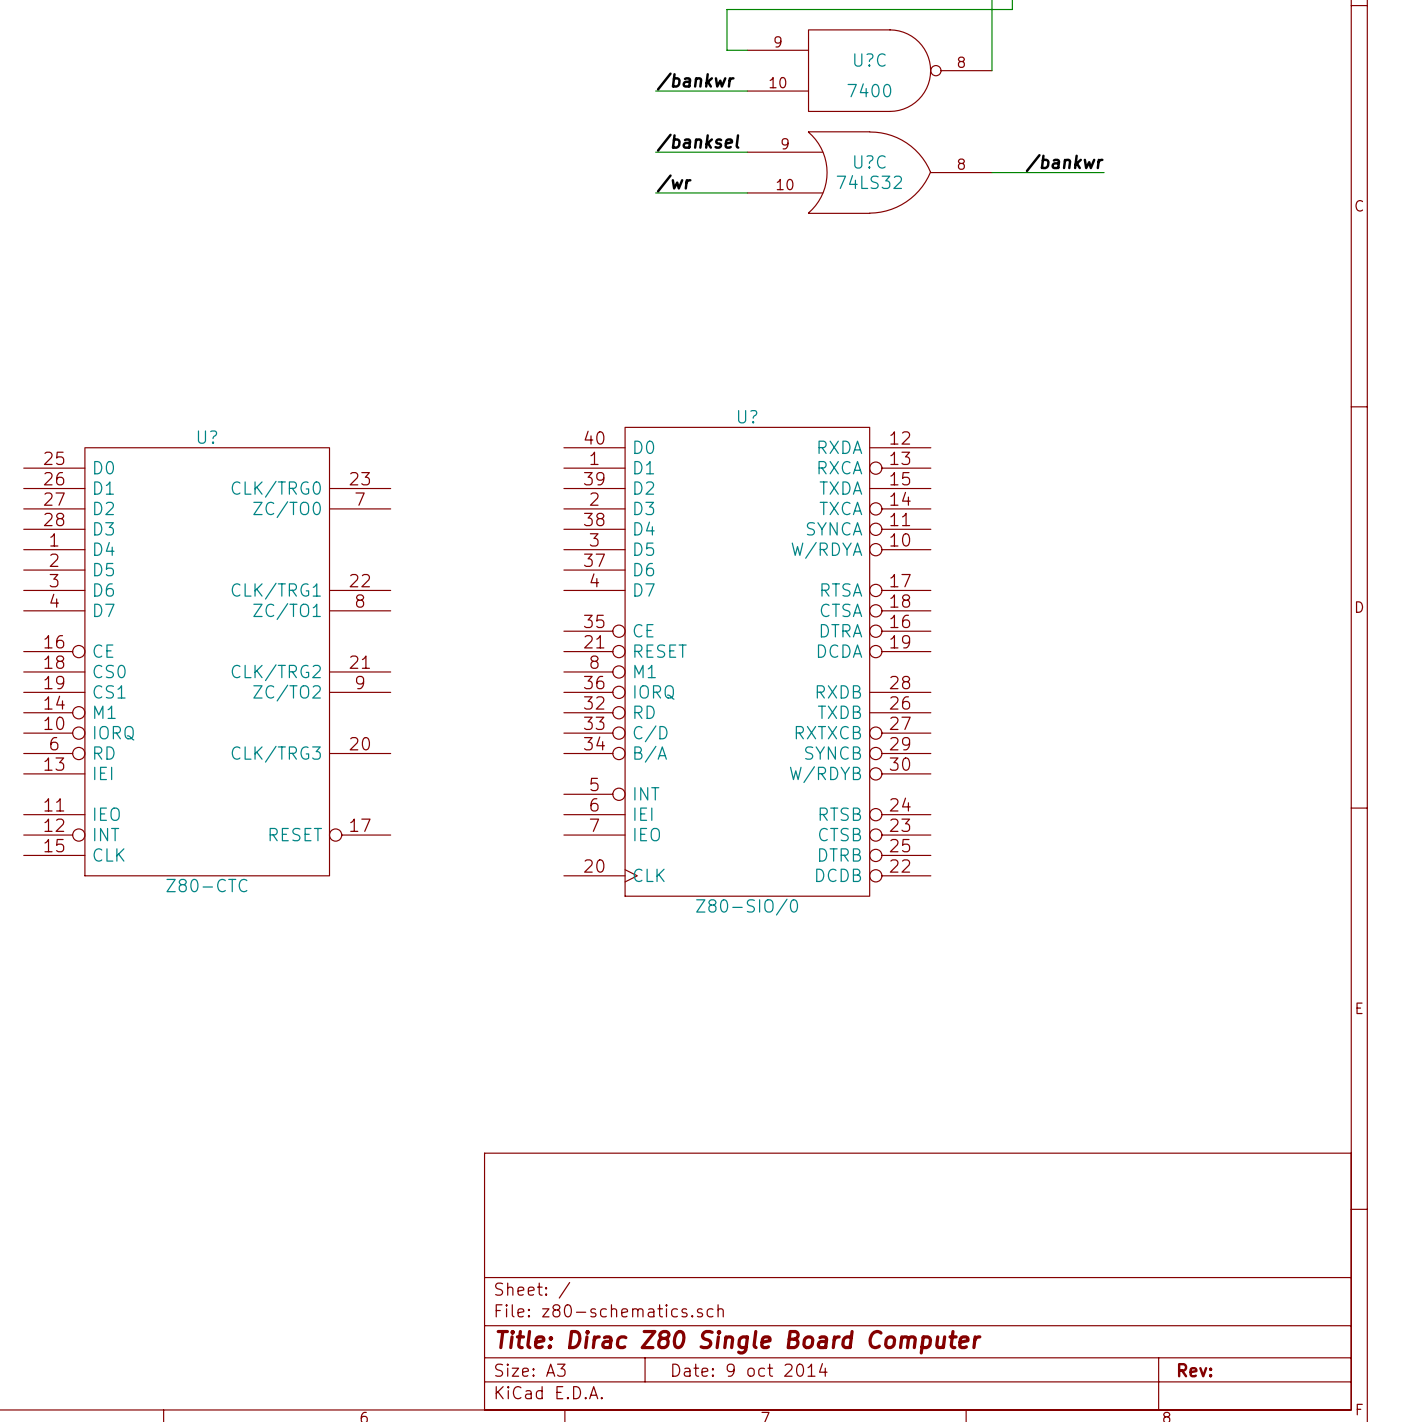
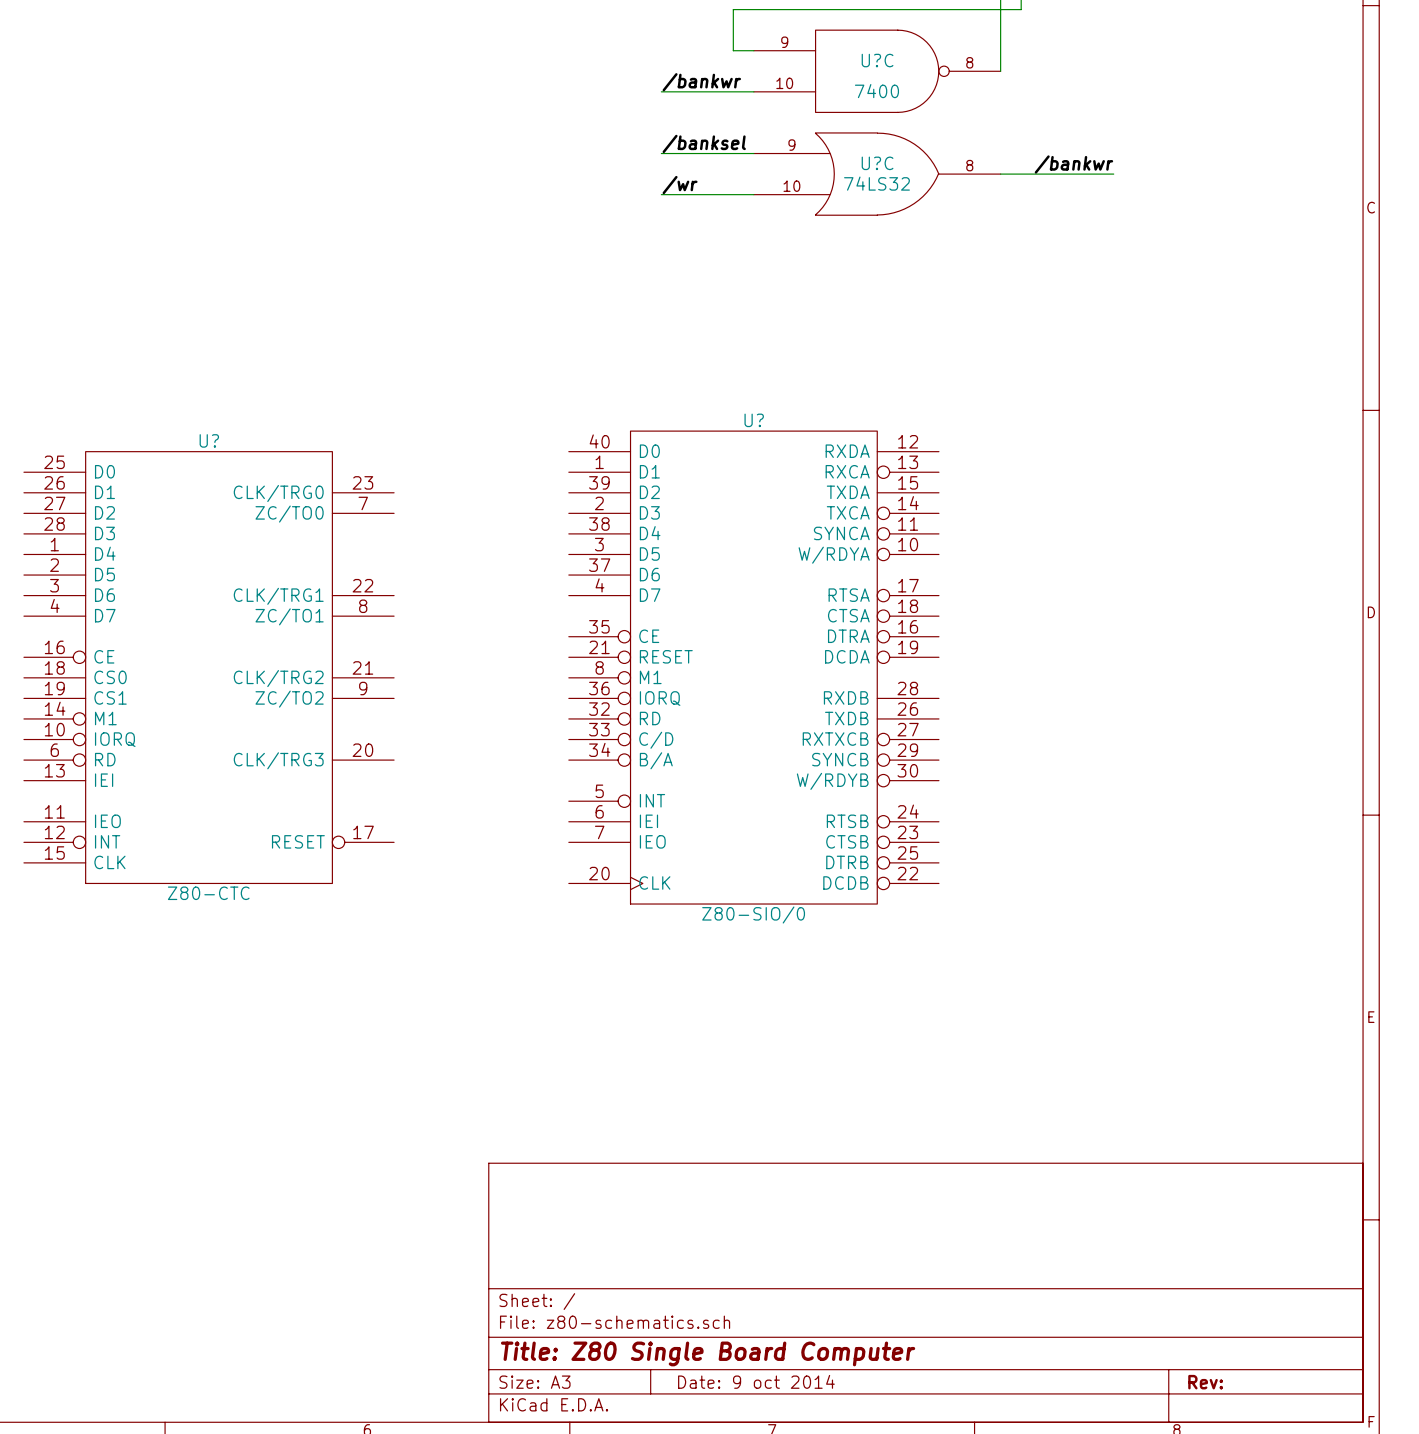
title block: Title: Dirac Z80 Single Board Computer (739, 1342) -> Title: Z80 Single Board Computer (708, 1353)

